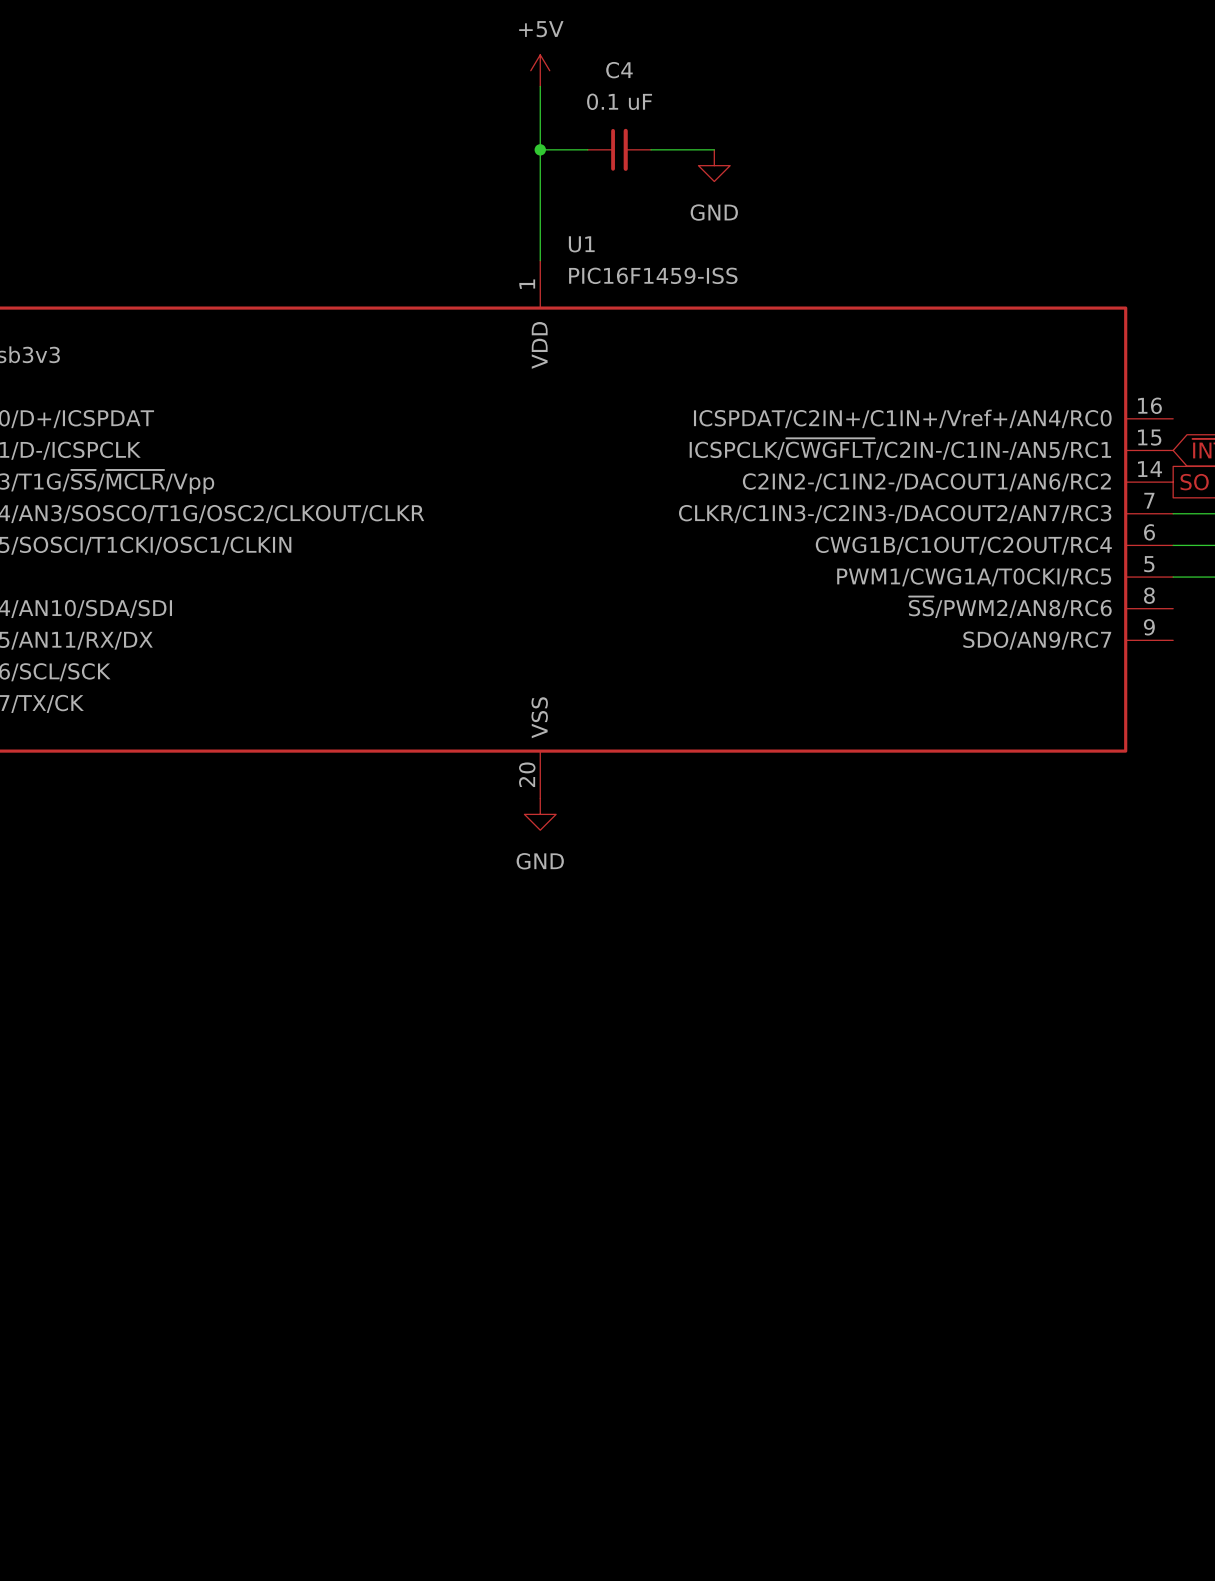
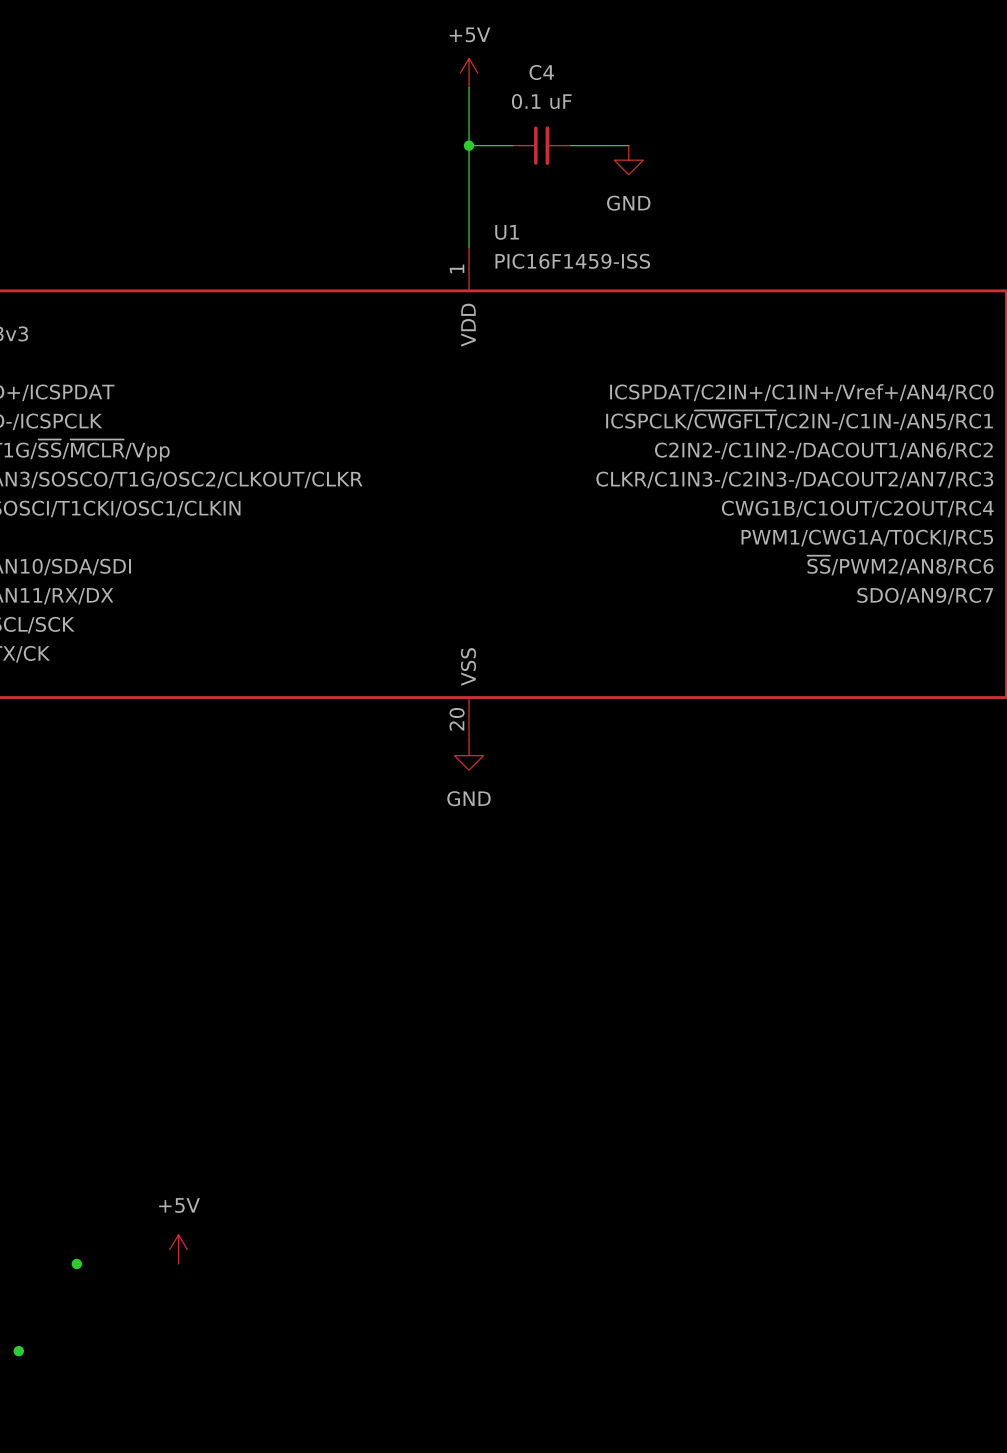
power symbol: none -> +5V (178, 1249)
junction: none -> (76, 1263)
junction: none -> (18, 1351)

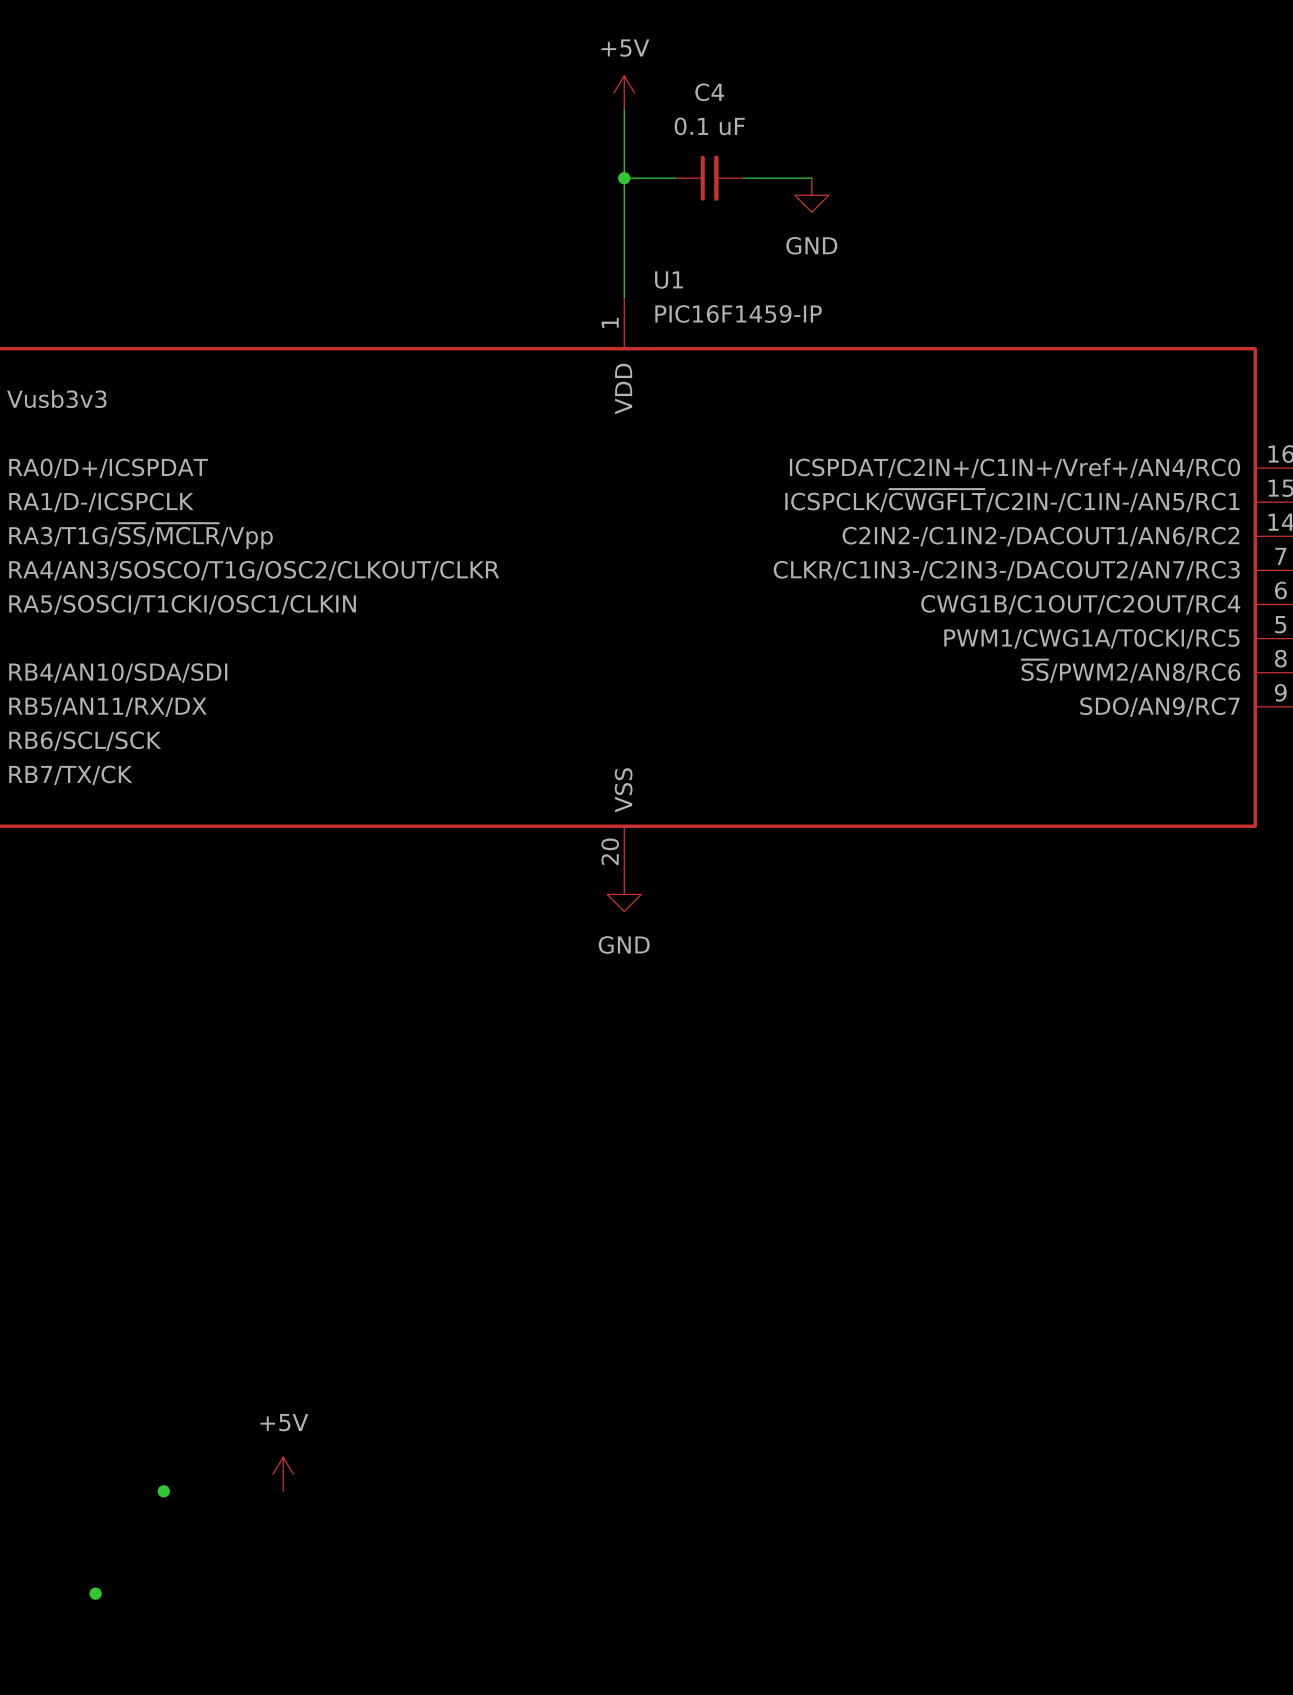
U1 value: PIC16F1459-ISS (572, 261) -> PIC16F1459-IP (738, 313)

